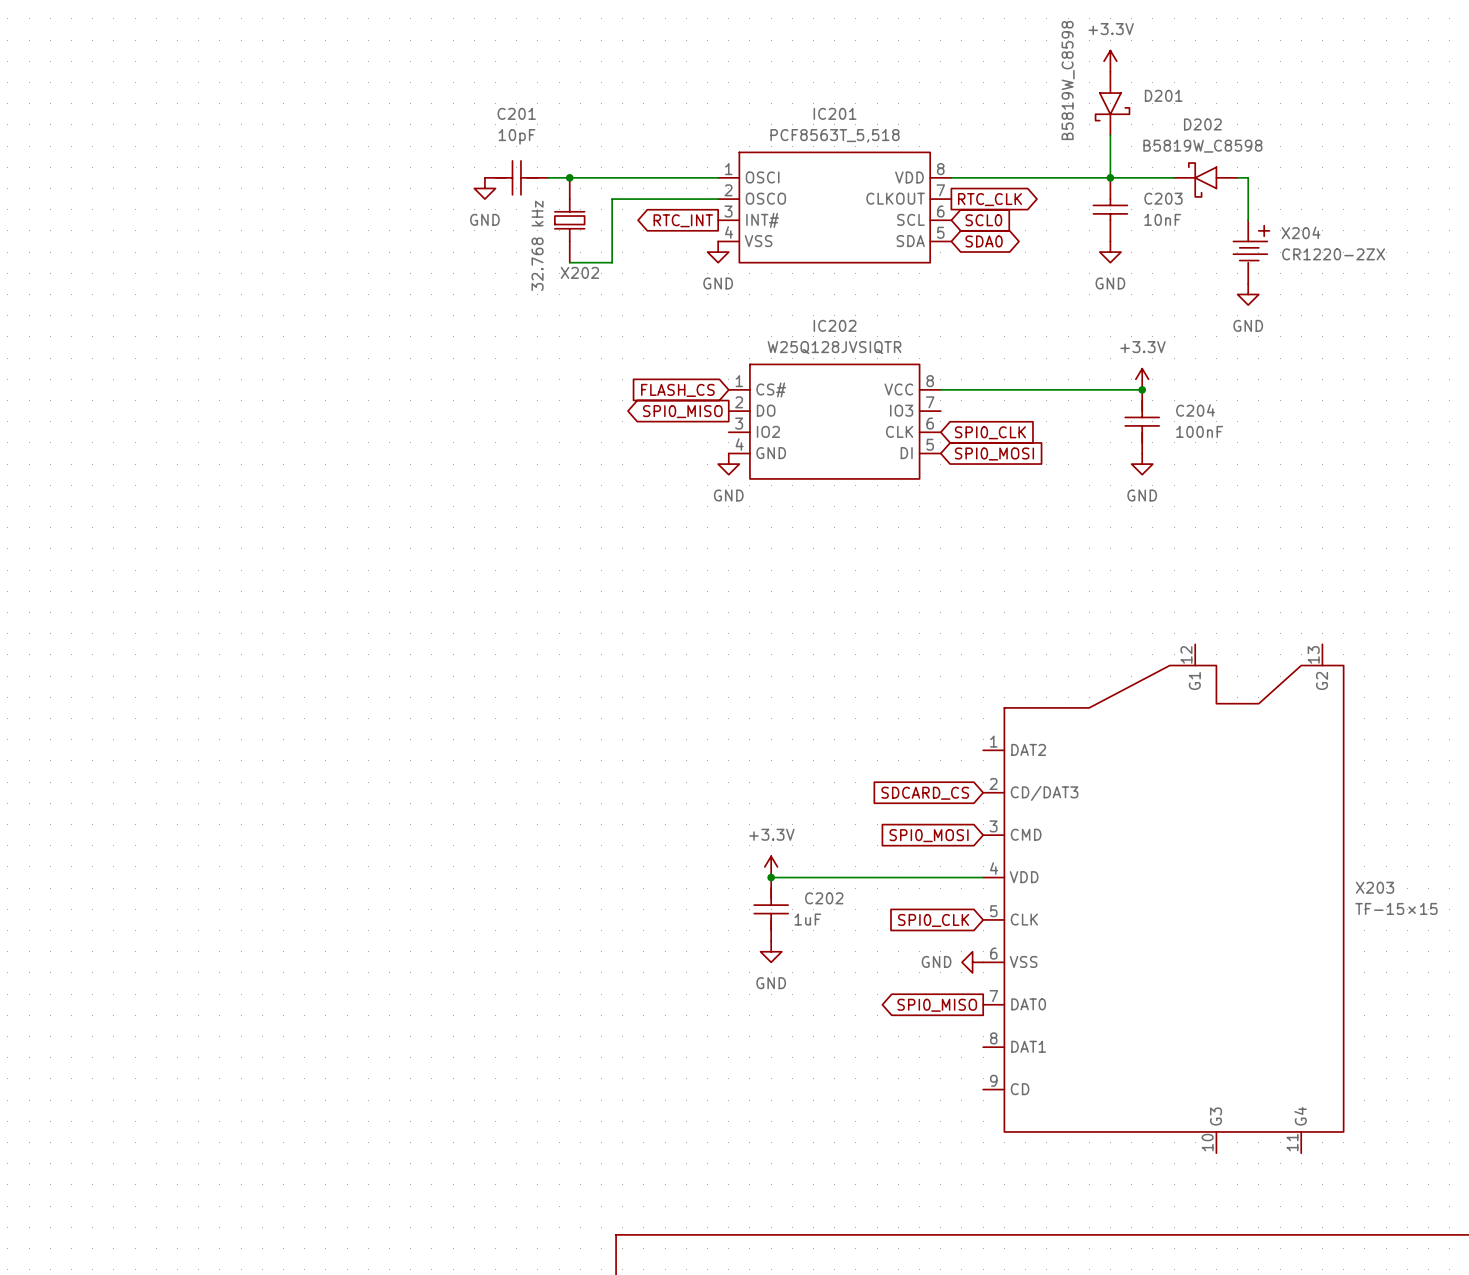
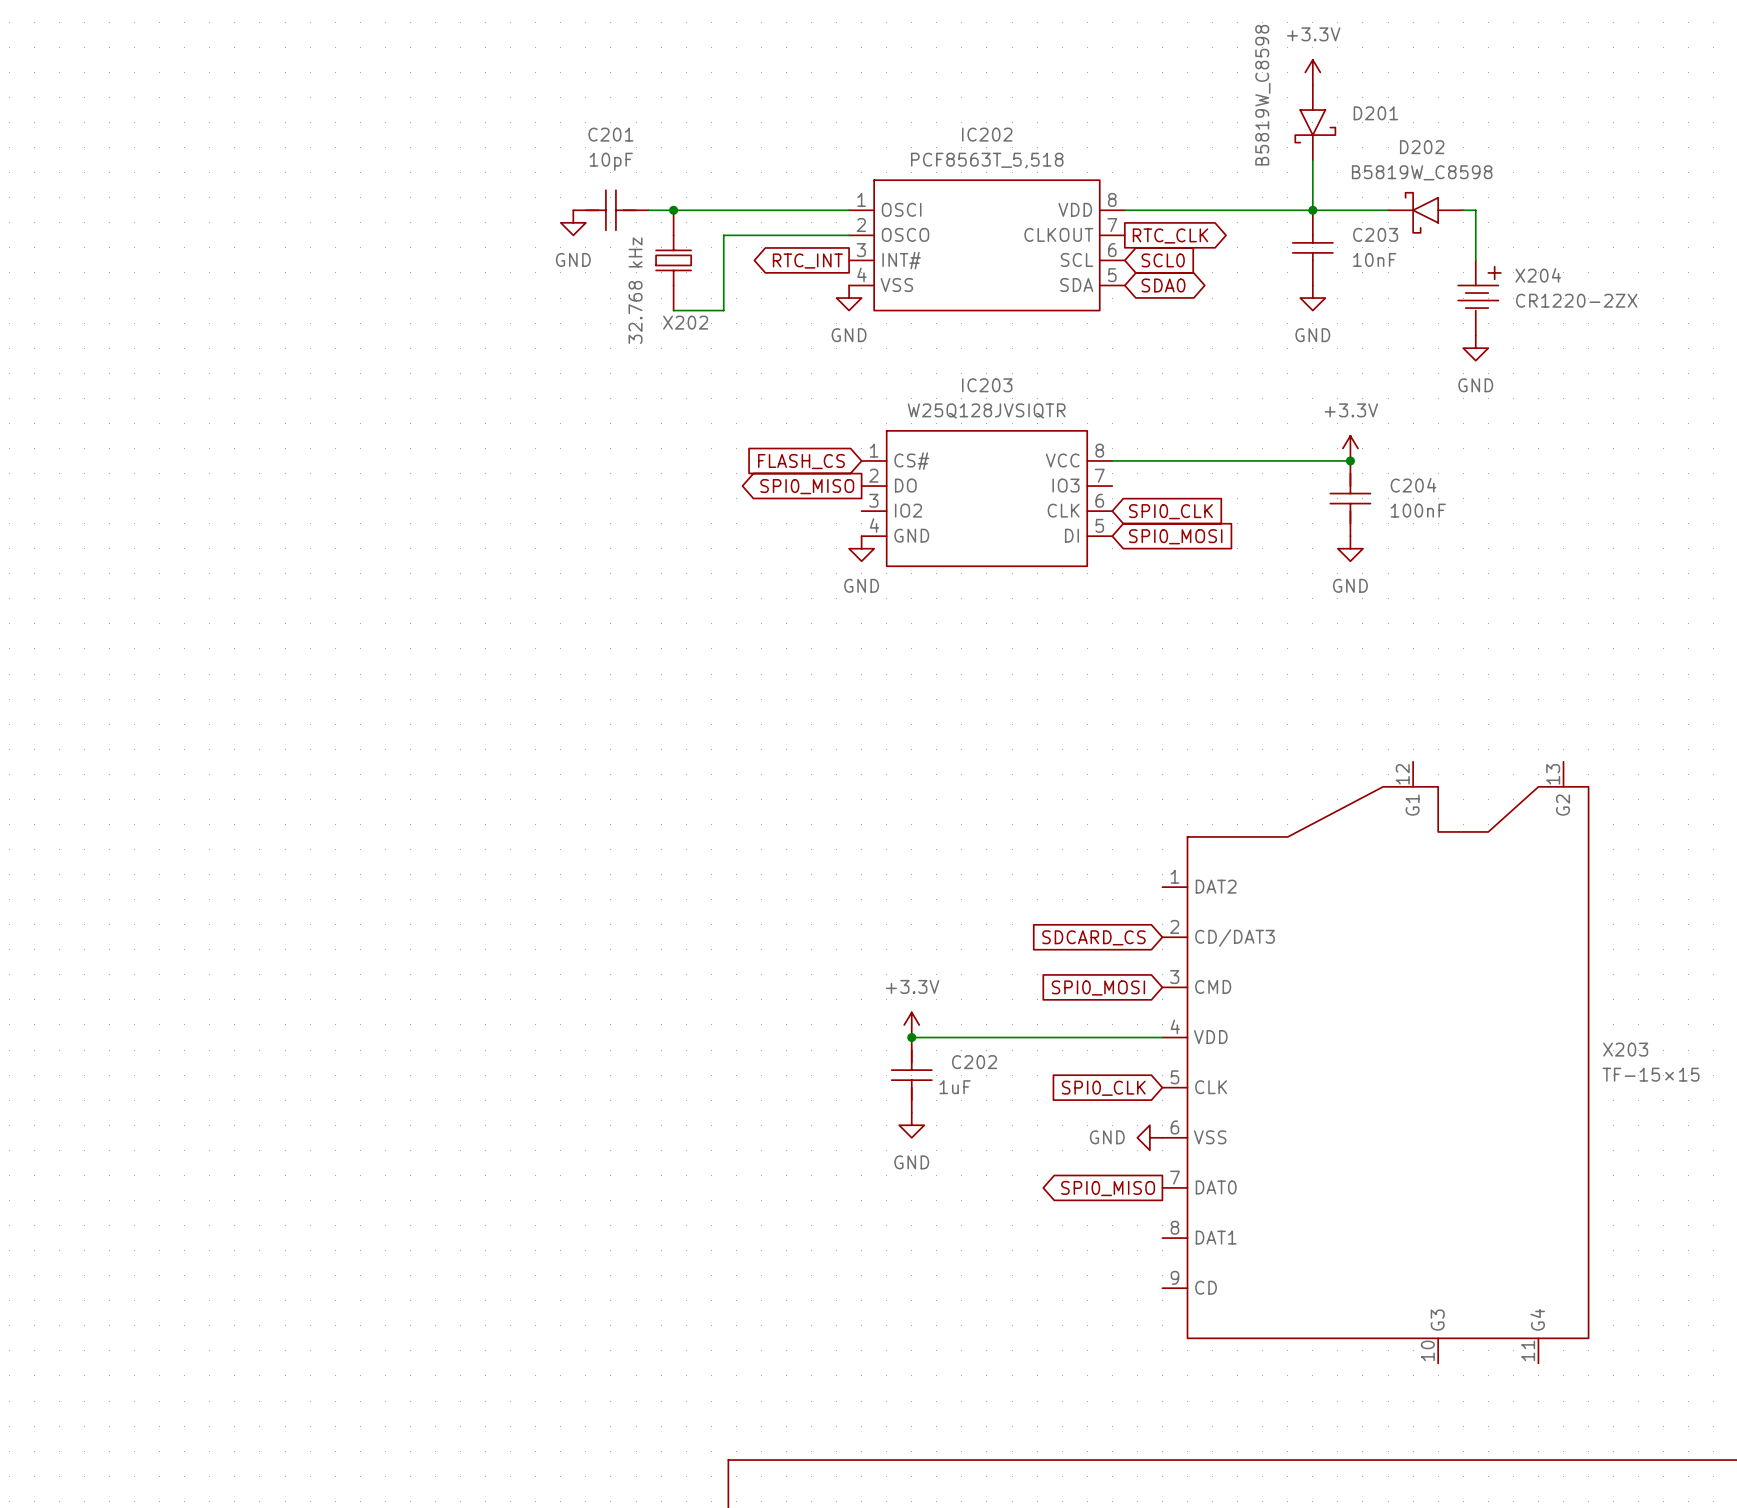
IC201 name: IC201 (835, 113) -> IC202 (987, 134)
IC202 name: IC202 (835, 325) -> IC203 (987, 385)

